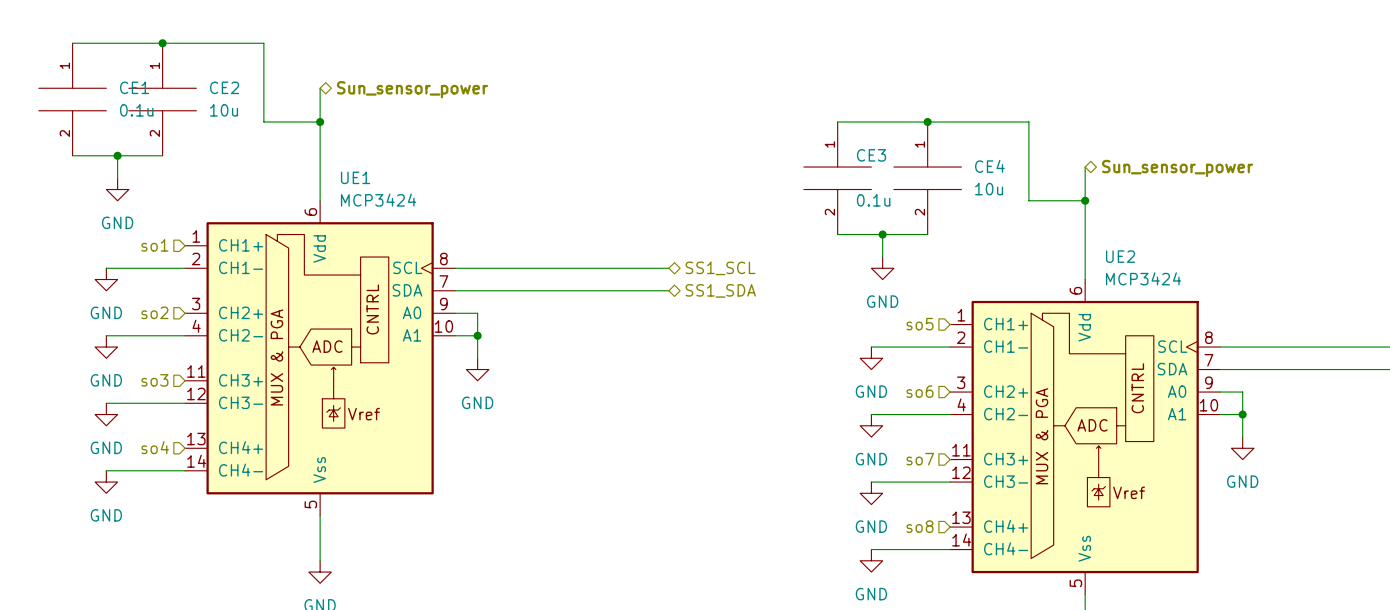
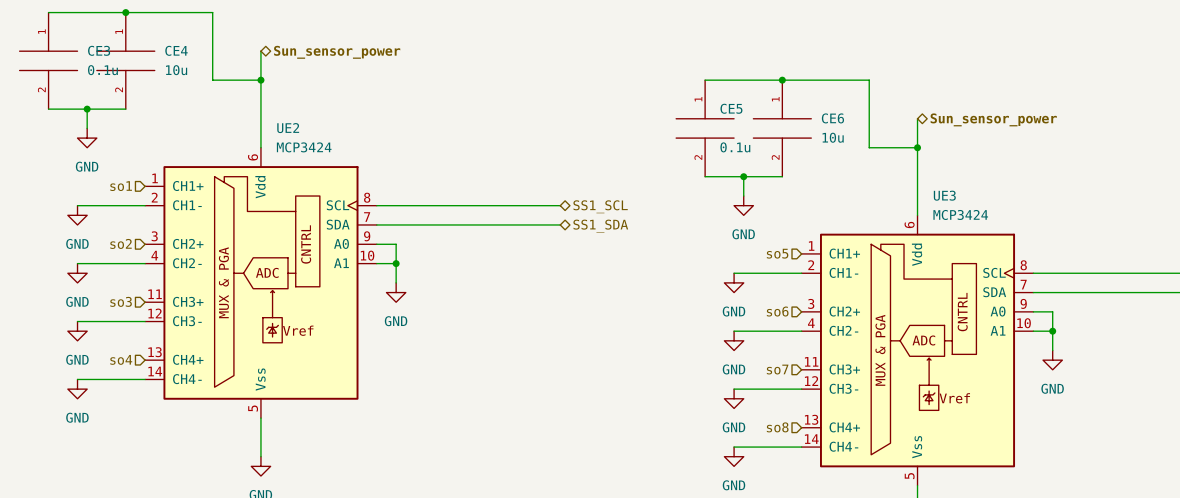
CE1 name: CE1 (134, 87) -> CE3 (99, 50)
CE2 name: CE2 (224, 87) -> CE4 (176, 50)
CE3 name: CE3 (871, 155) -> CE5 (731, 108)
CE4 name: CE4 (989, 166) -> CE6 (832, 118)
UE1 name: UE1 (355, 177) -> UE2 (288, 128)
UE2 name: UE2 (1120, 256) -> UE3 (944, 195)

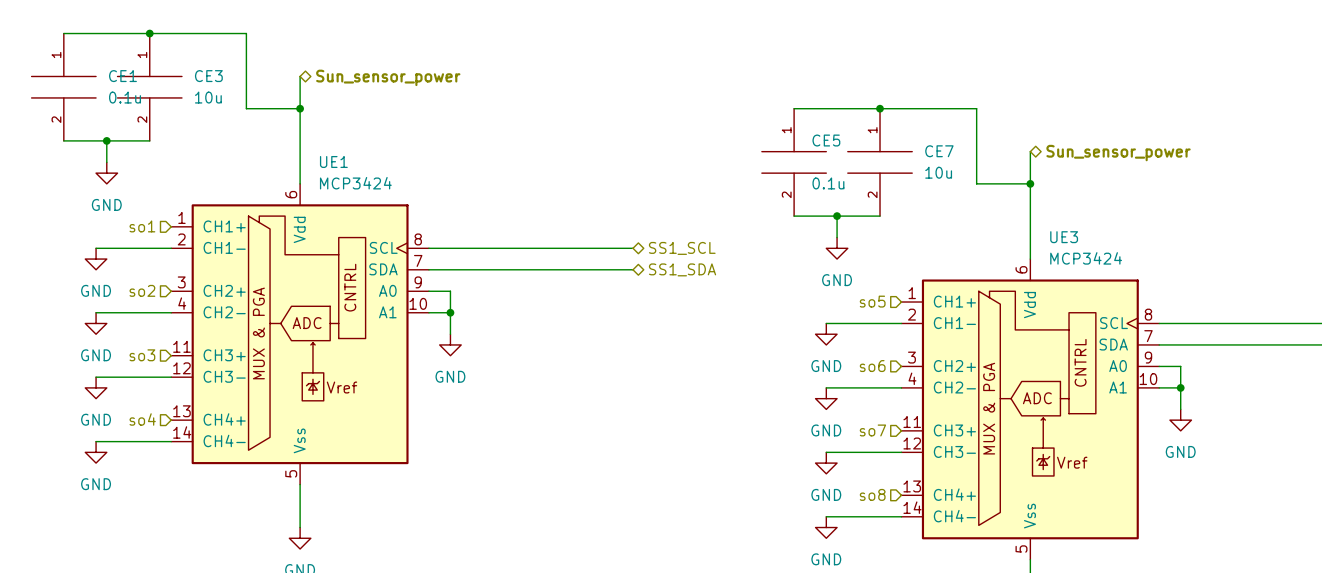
CE3 name: CE3 (99, 50) -> CE1 (122, 76)
CE4 name: CE4 (176, 50) -> CE3 (208, 76)
CE6 name: CE6 (832, 118) -> CE7 (939, 151)
UE2 name: UE2 (288, 128) -> UE1 (333, 161)

